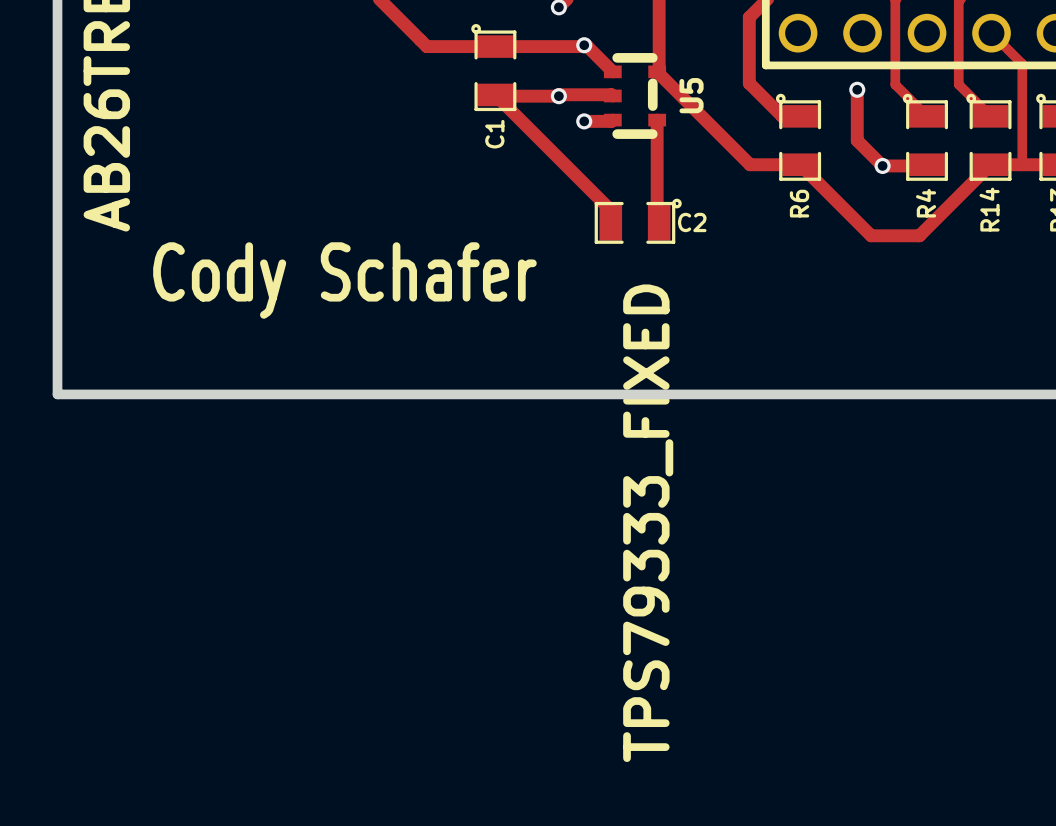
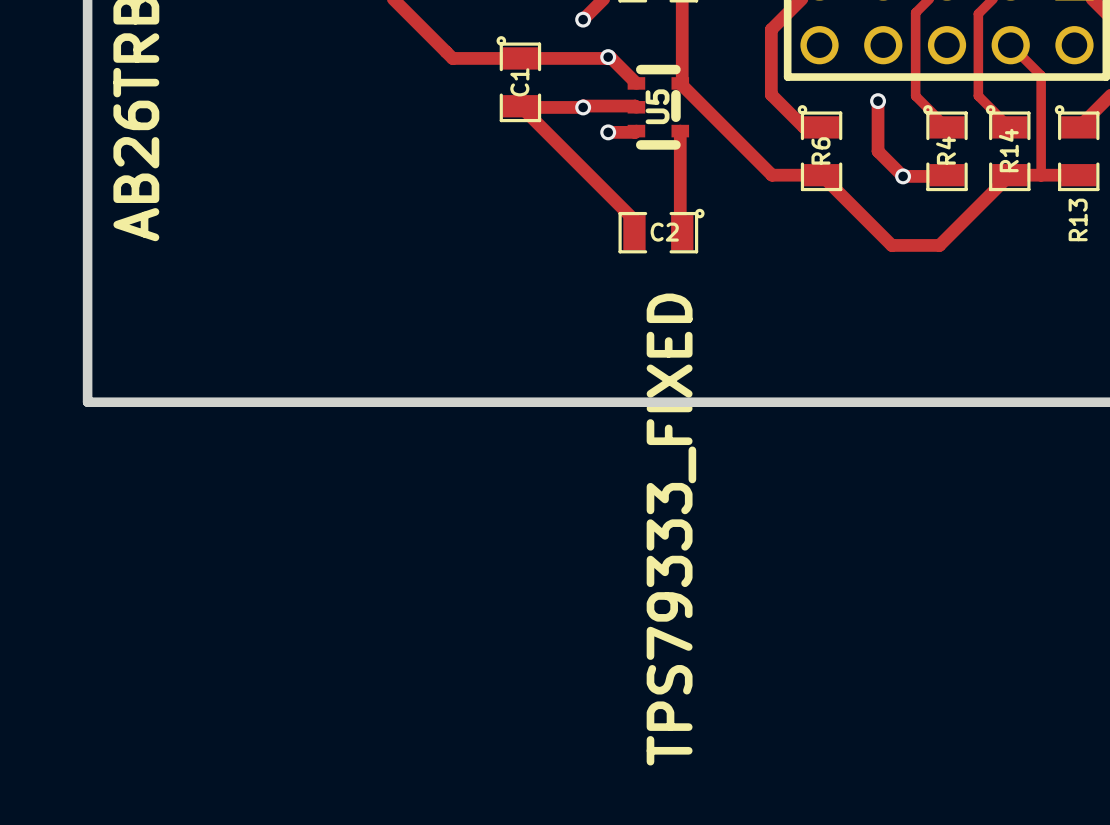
U5 name position: U5 (691, 95) -> U5 (657, 106)
C1 name position: C1 (494, 134) -> C1 (519, 82)
R6 name position: R6 (799, 203) -> R6 (820, 150)
R4 name position: R4 (926, 203) -> R4 (946, 150)
R14 name position: R14 (989, 209) -> R14 (1008, 150)
C2 name position: C2 (692, 222) -> C2 (664, 232)
text: Cody Schafer (344, 280) -> none

